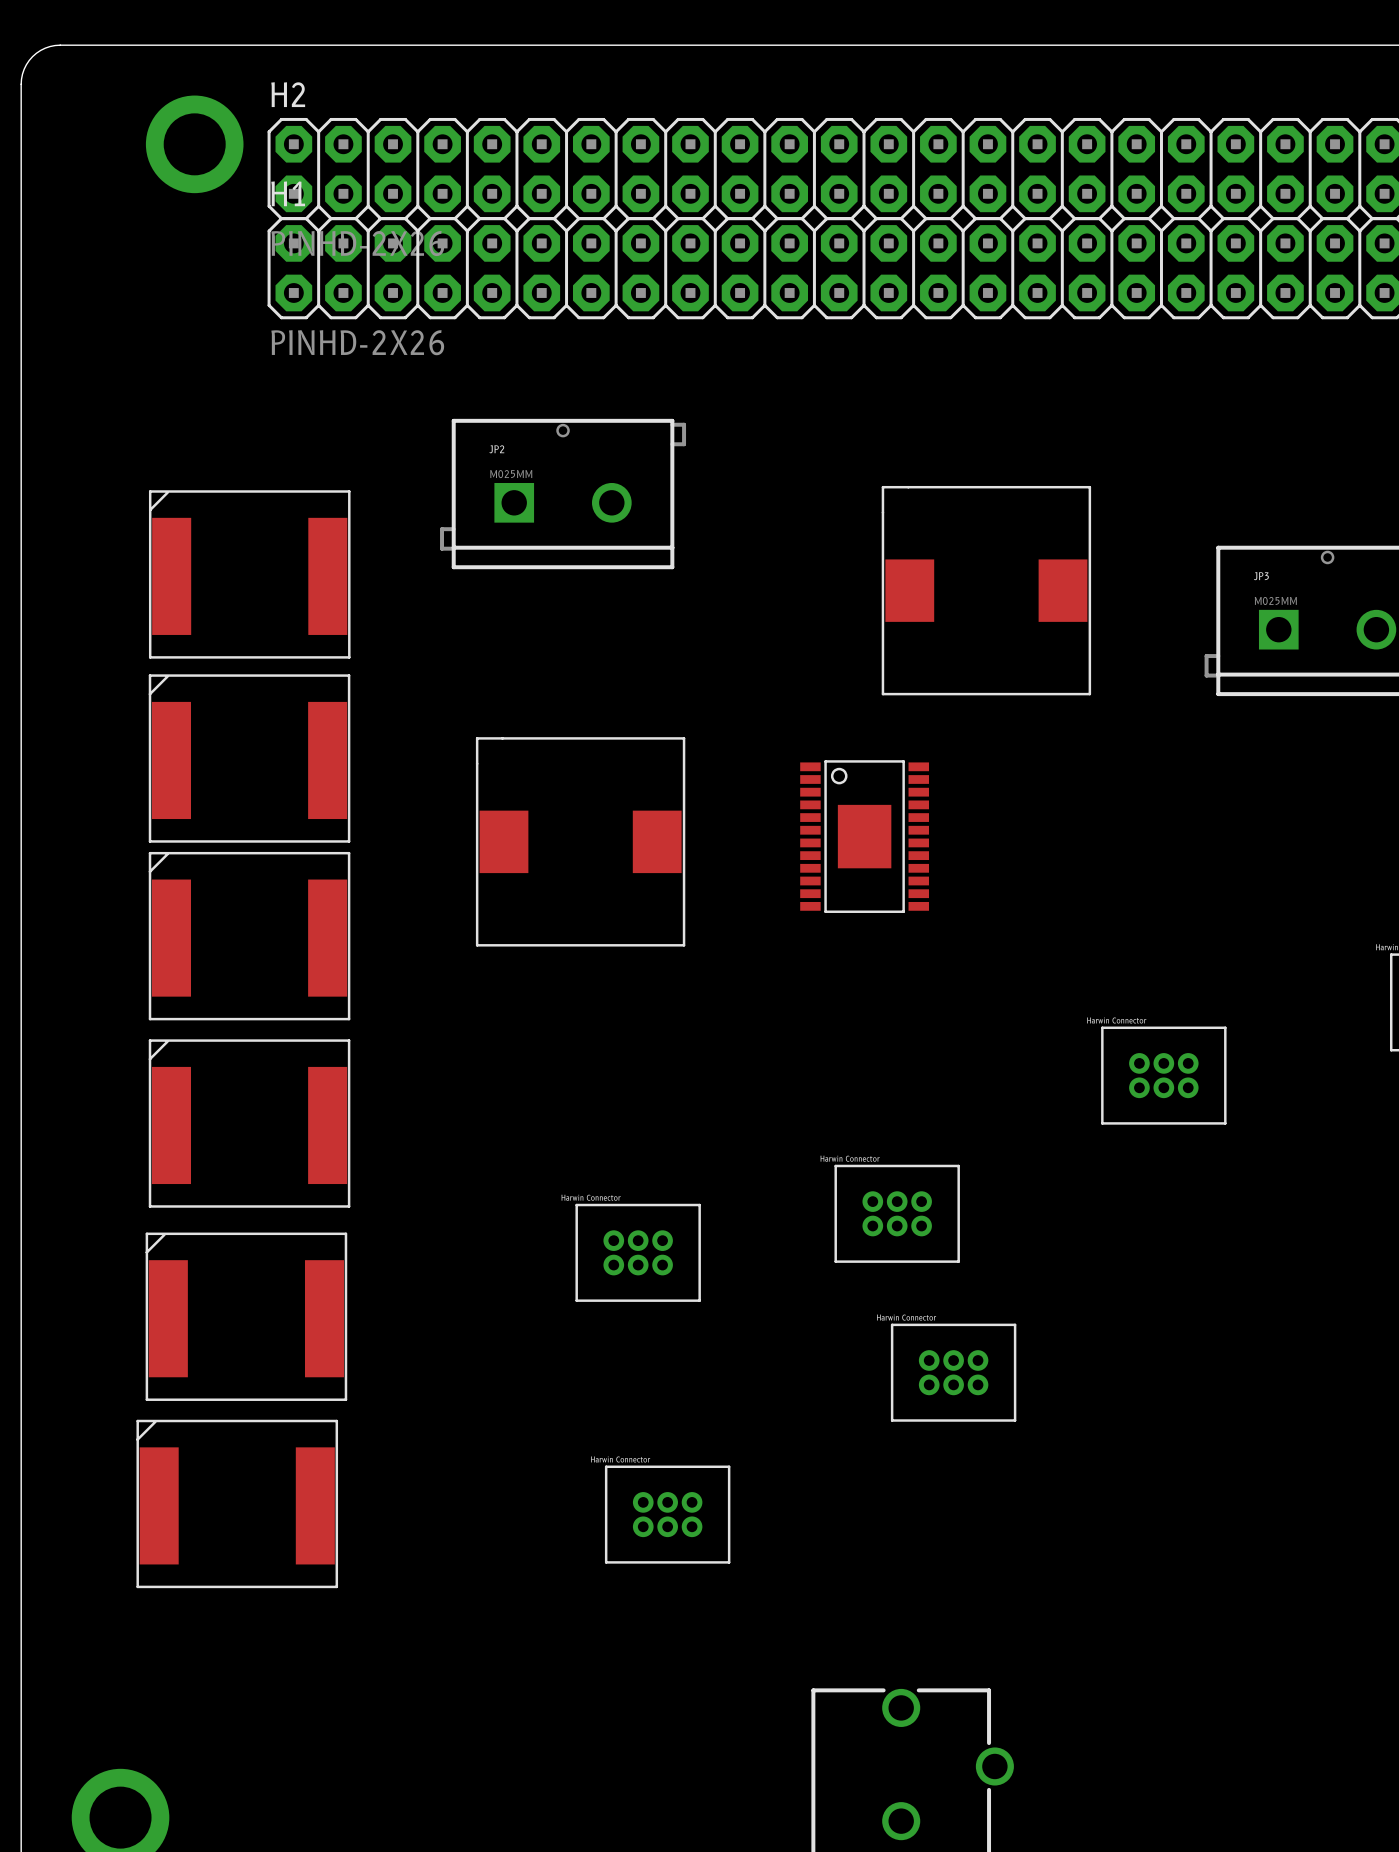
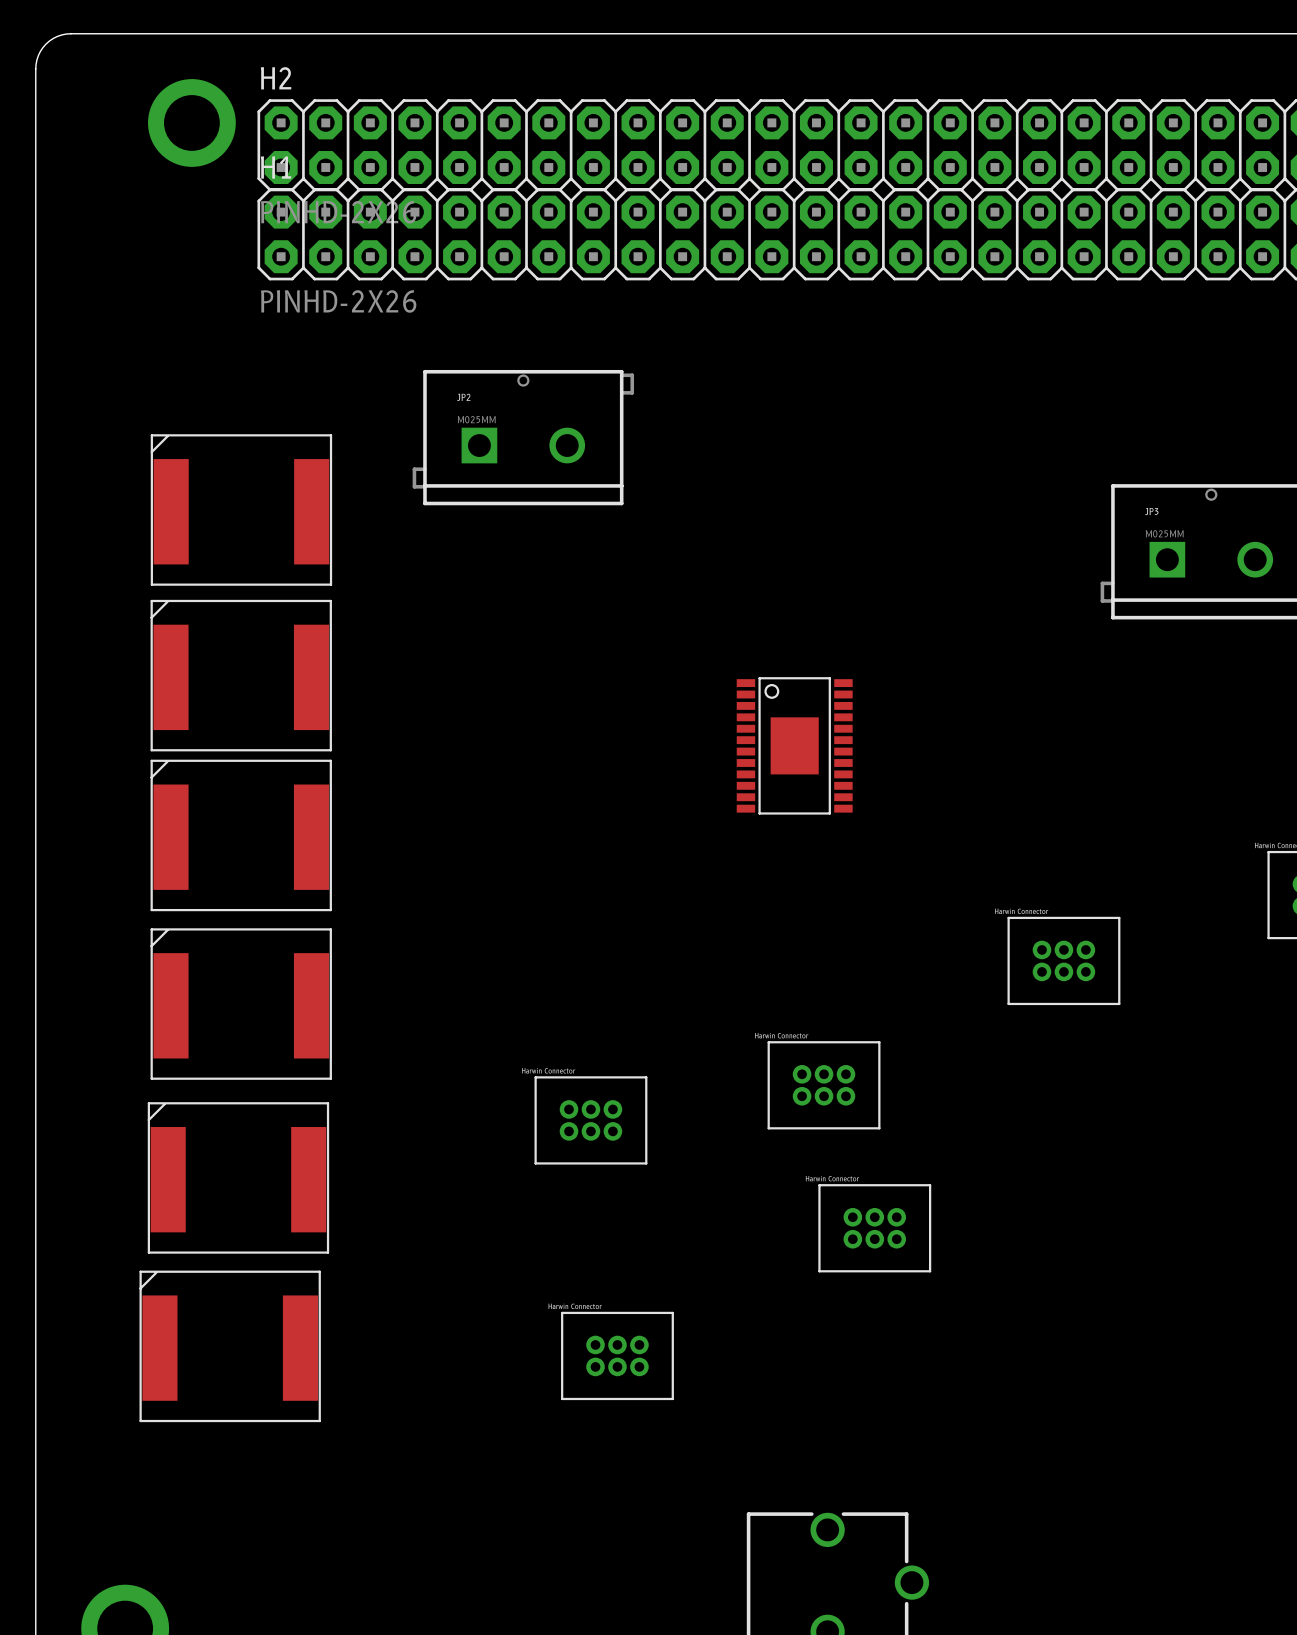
part: (986, 590) -> none
part: (580, 841) -> none

